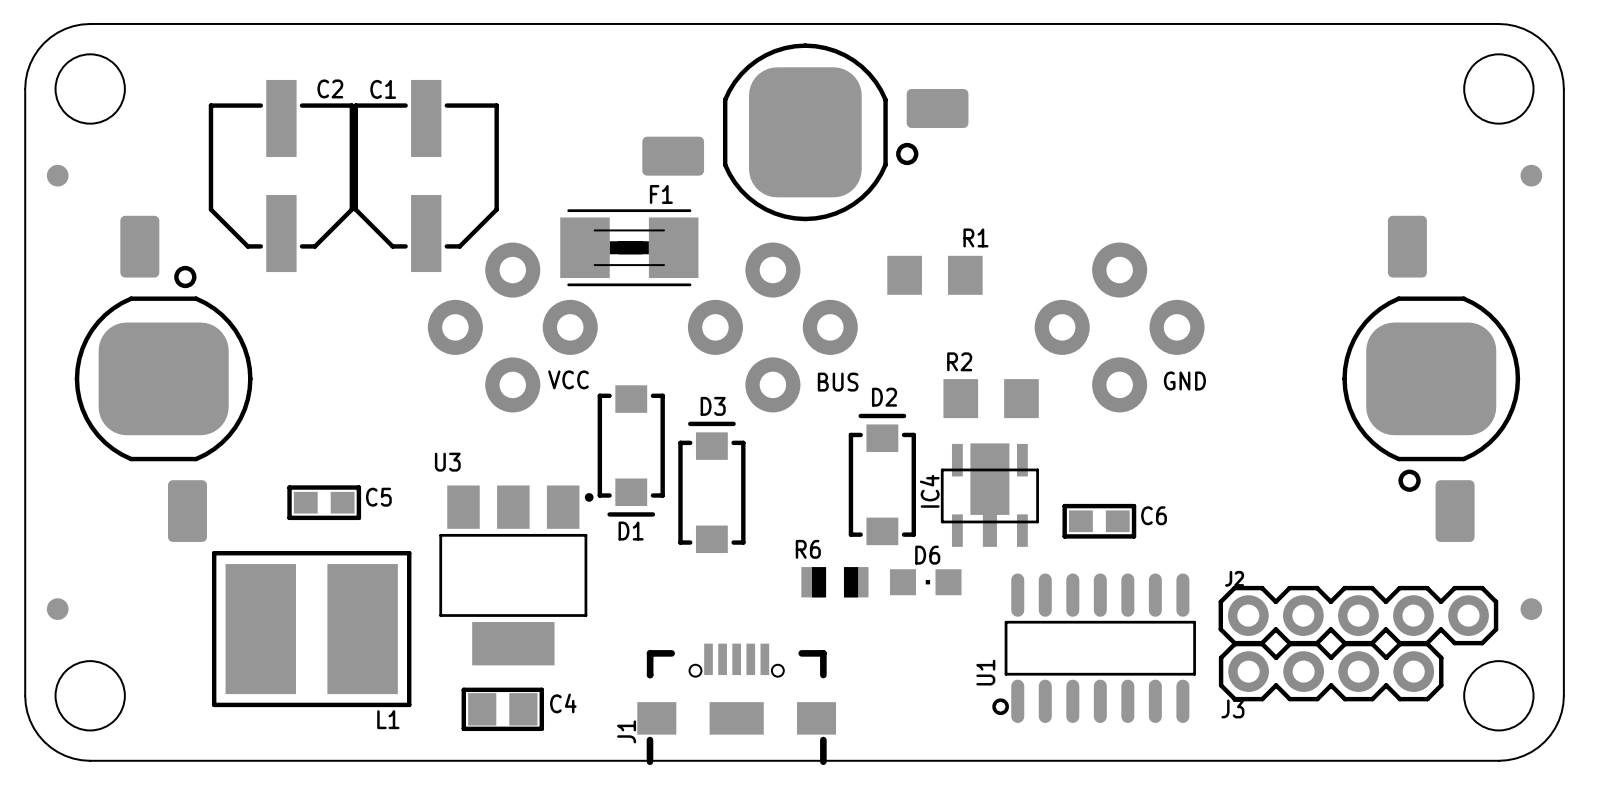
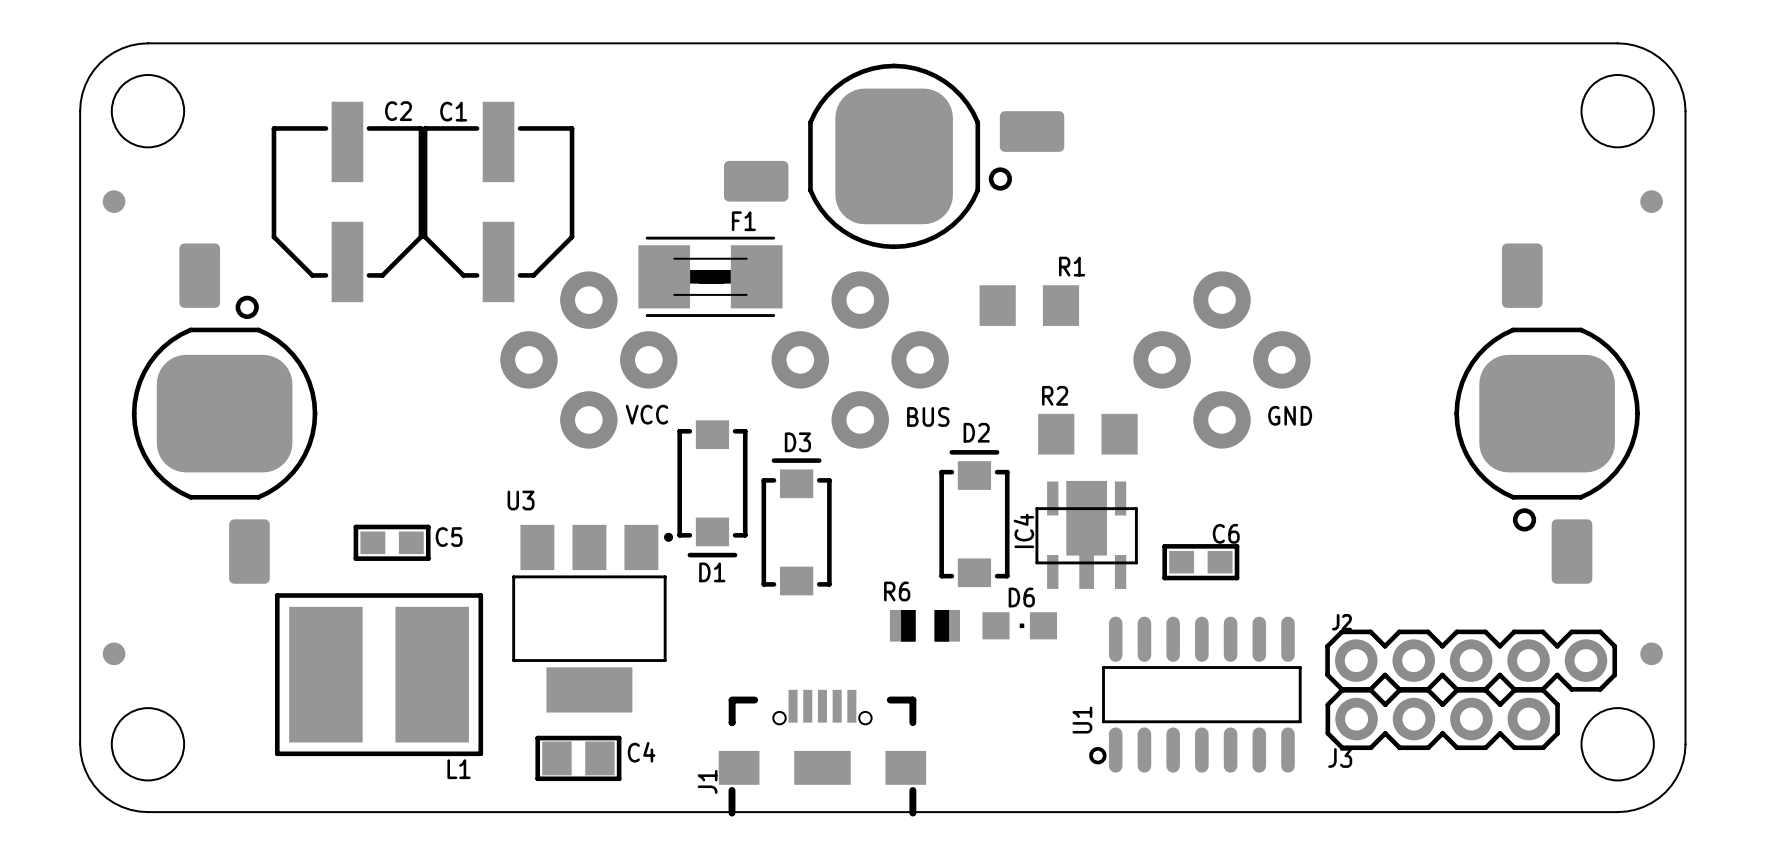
C6 name position: C6 (1154, 515) -> C6 (1226, 533)

